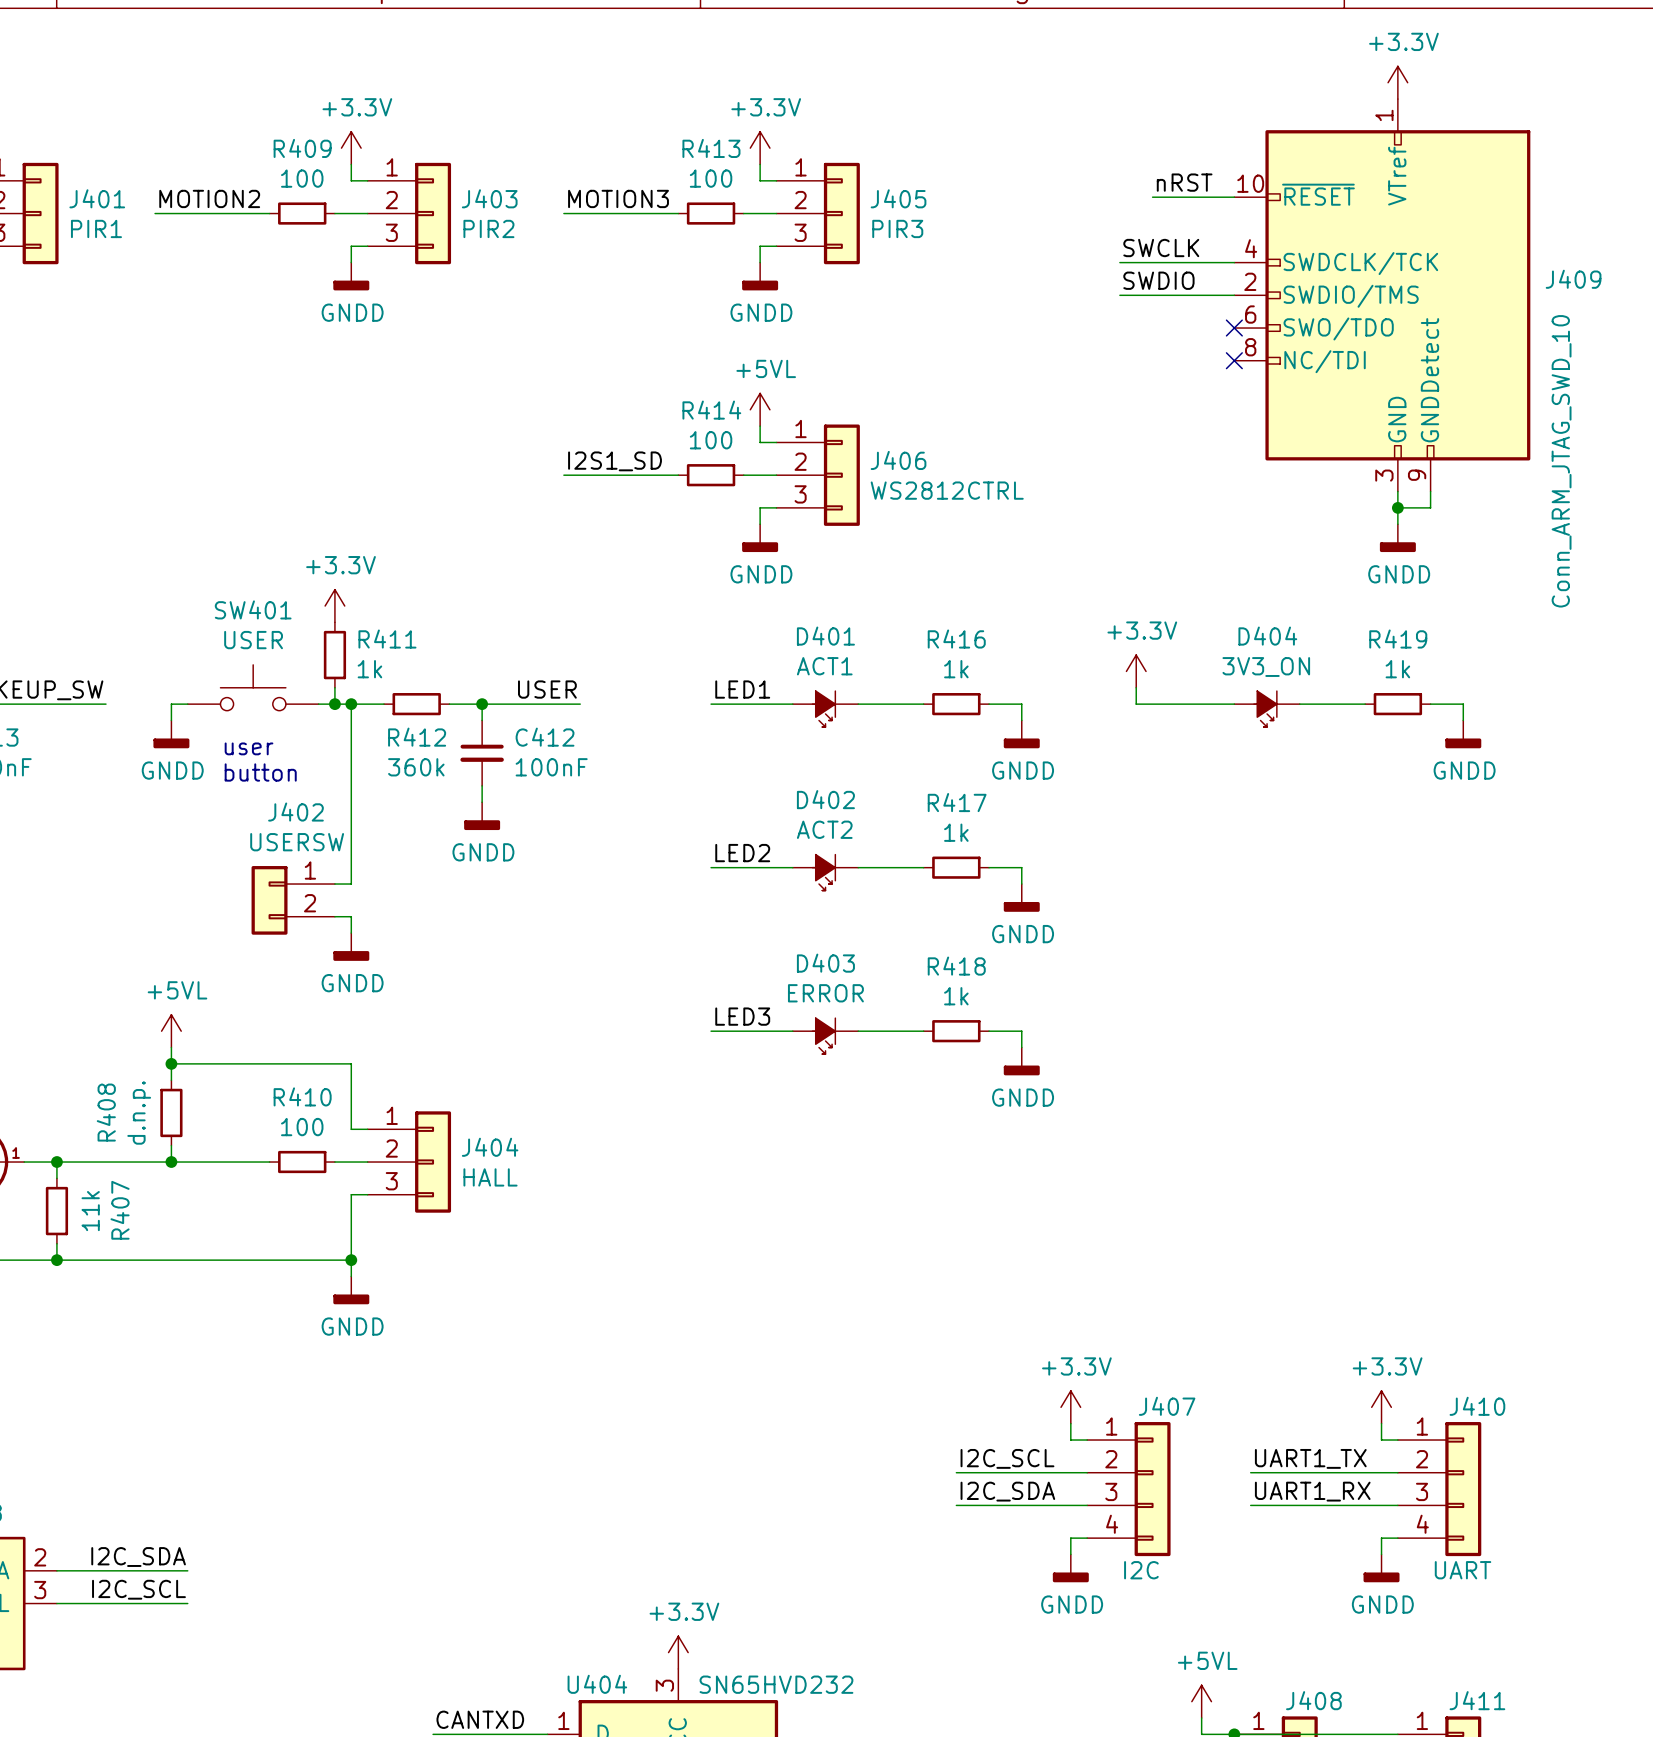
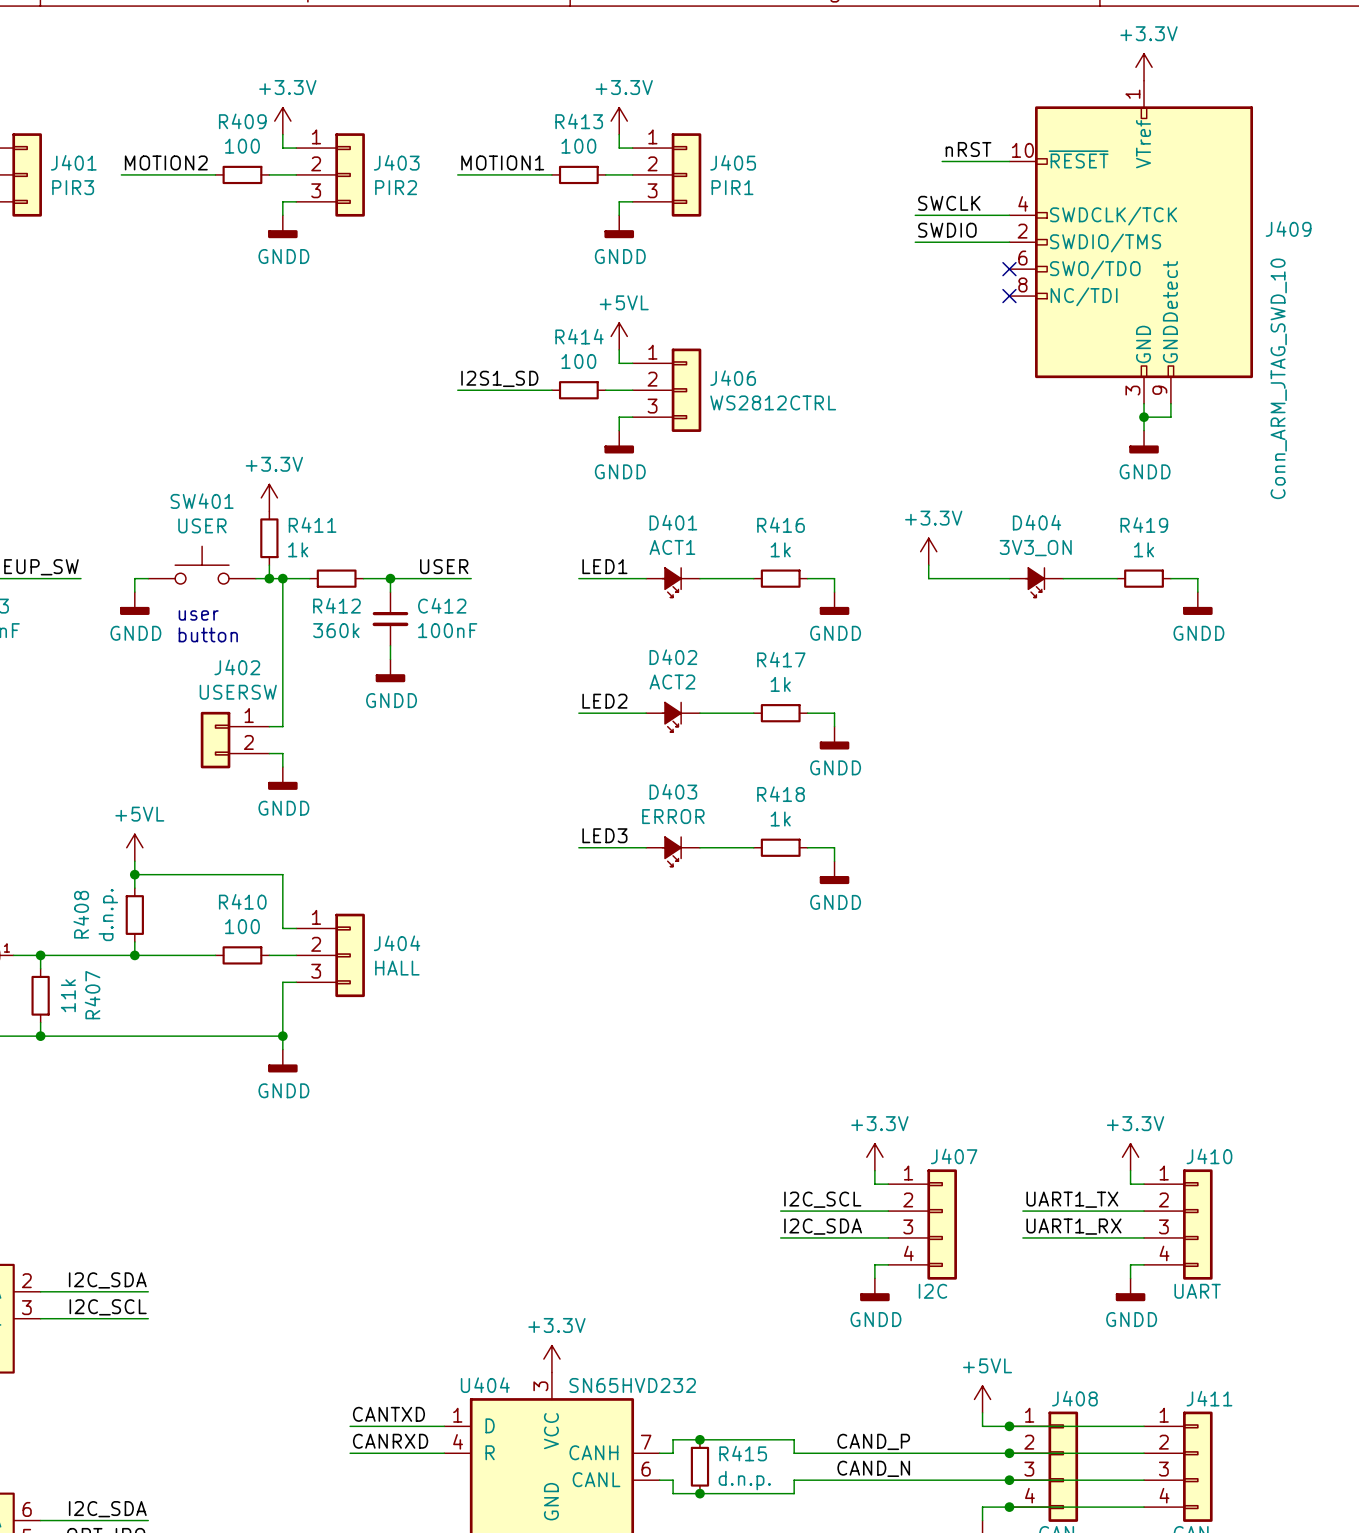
label: MOTION3 (618, 198) -> MOTION1 (502, 162)
J401 value: PIR1 (96, 228) -> PIR3 (73, 187)
J405 value: PIR3 (897, 228) -> PIR1 (732, 187)

